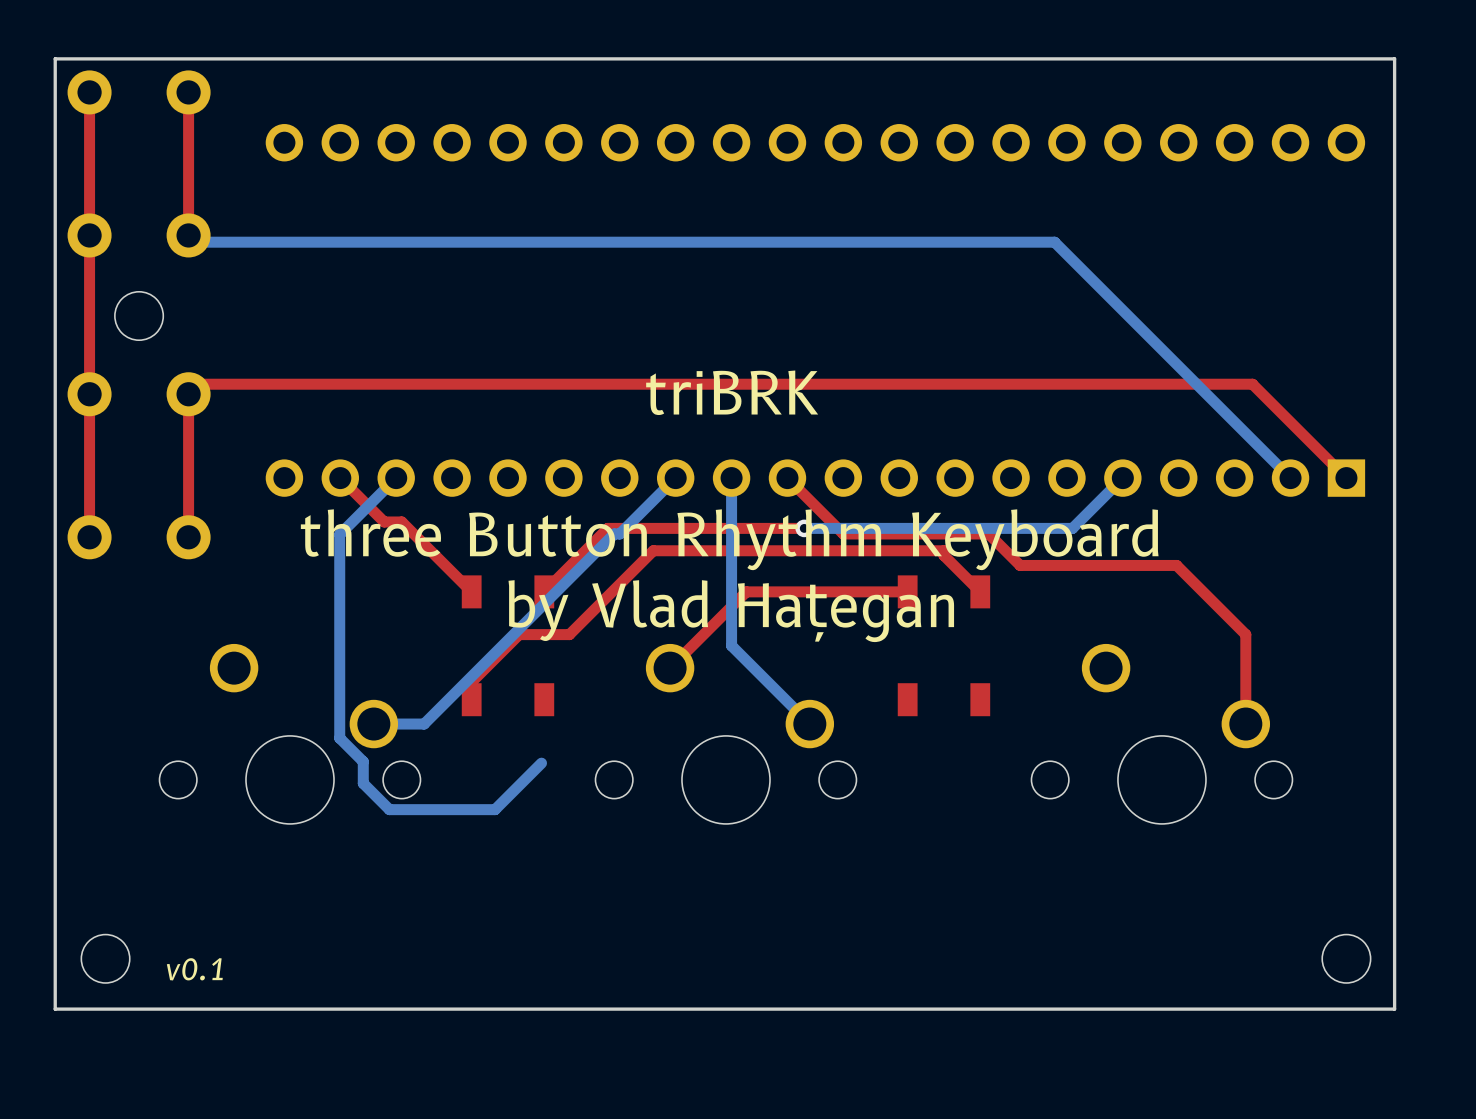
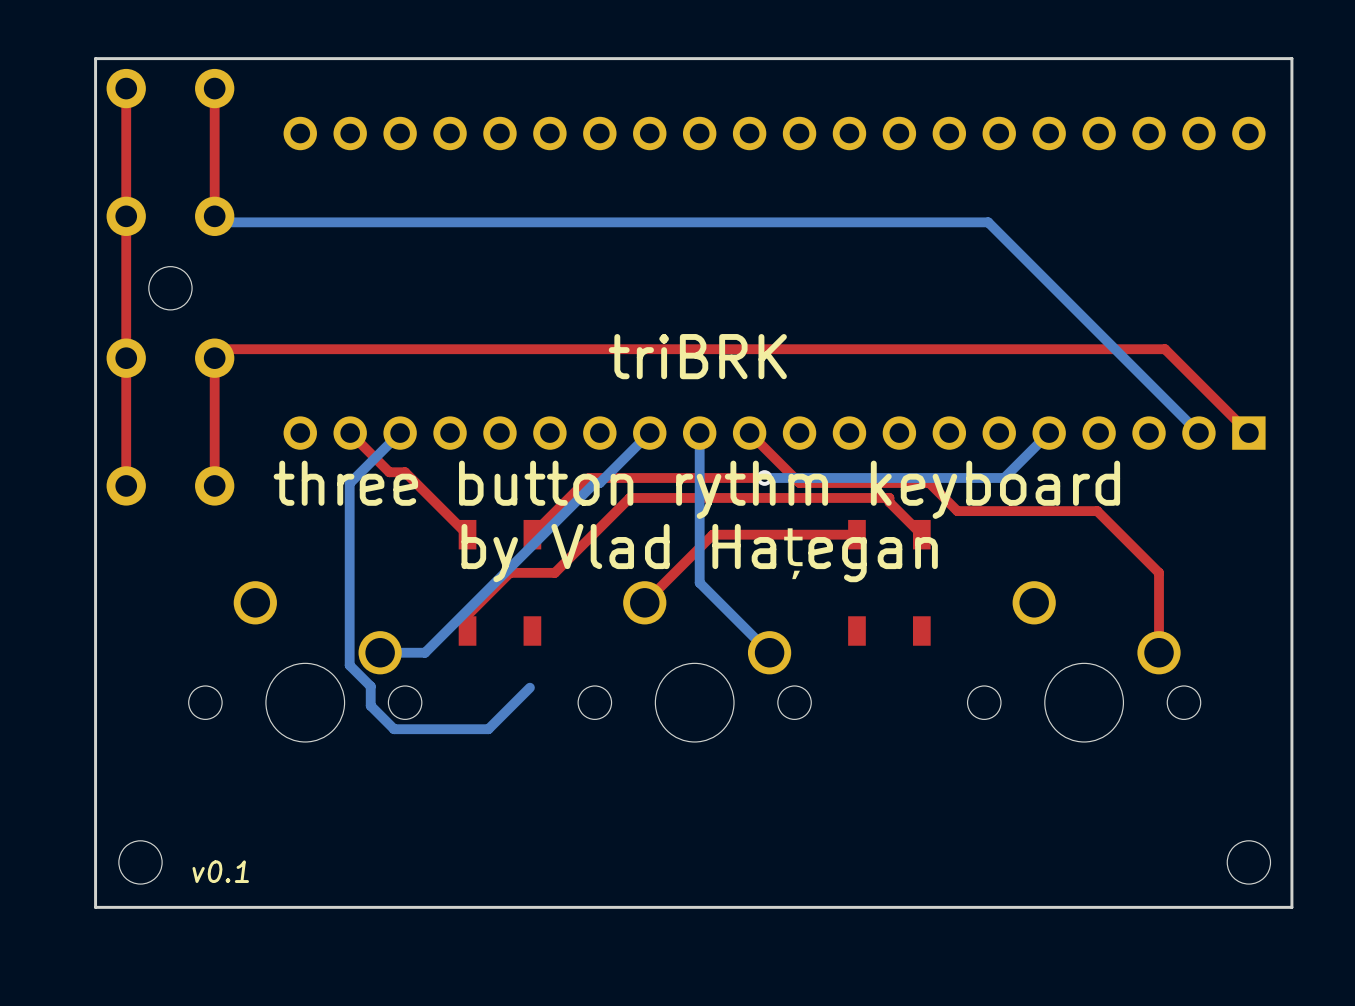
text: three Button Rhythm Keyboard (729, 539) -> three button rythm keyboard (696, 489)

